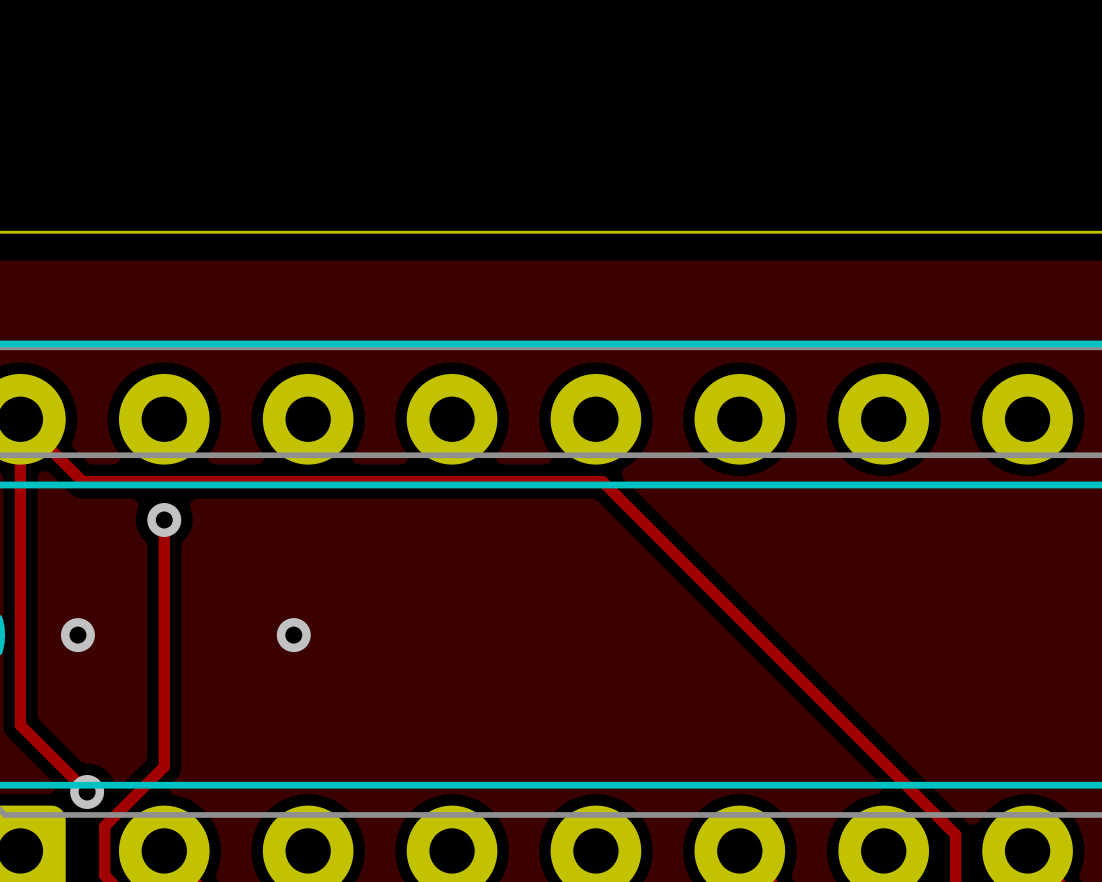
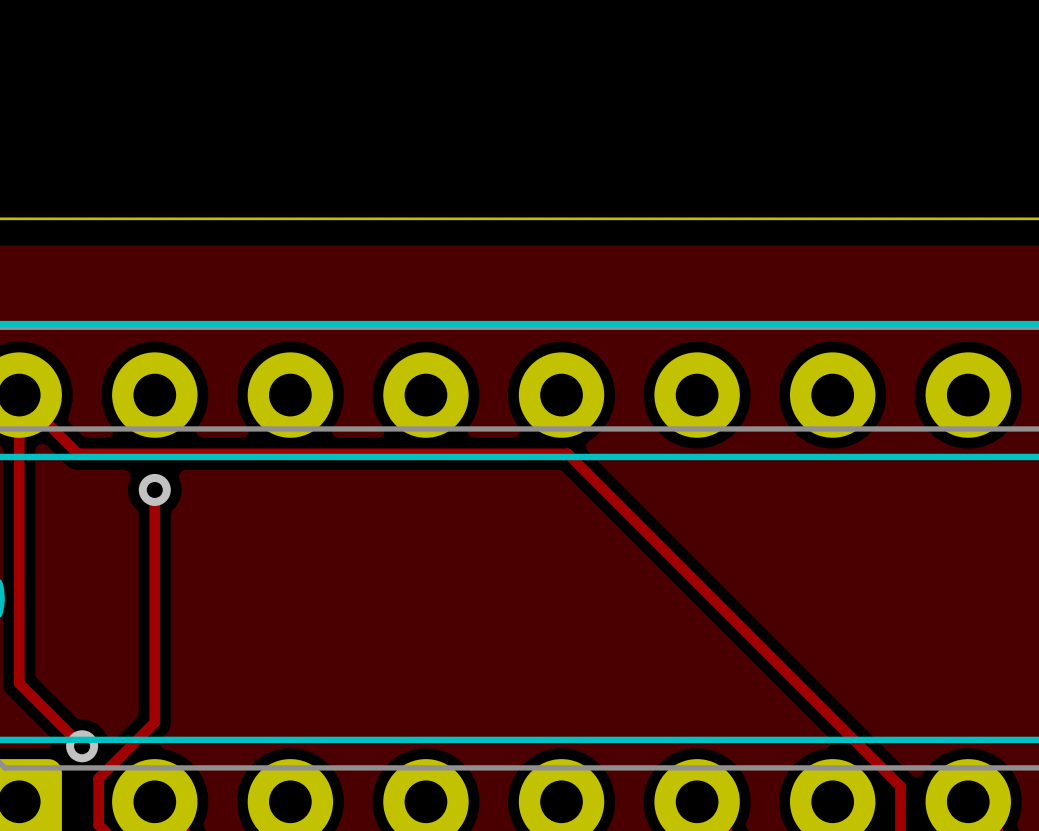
via: (77, 635) -> none
via: (293, 635) -> none

